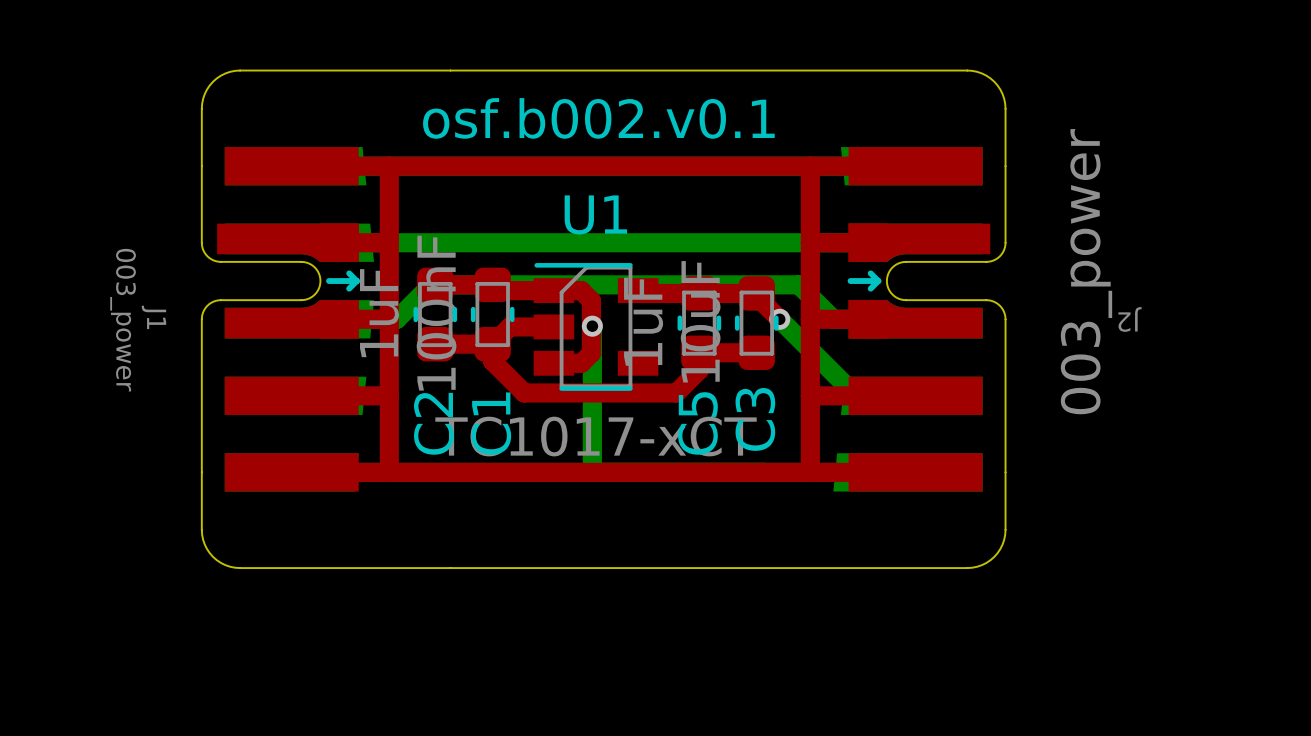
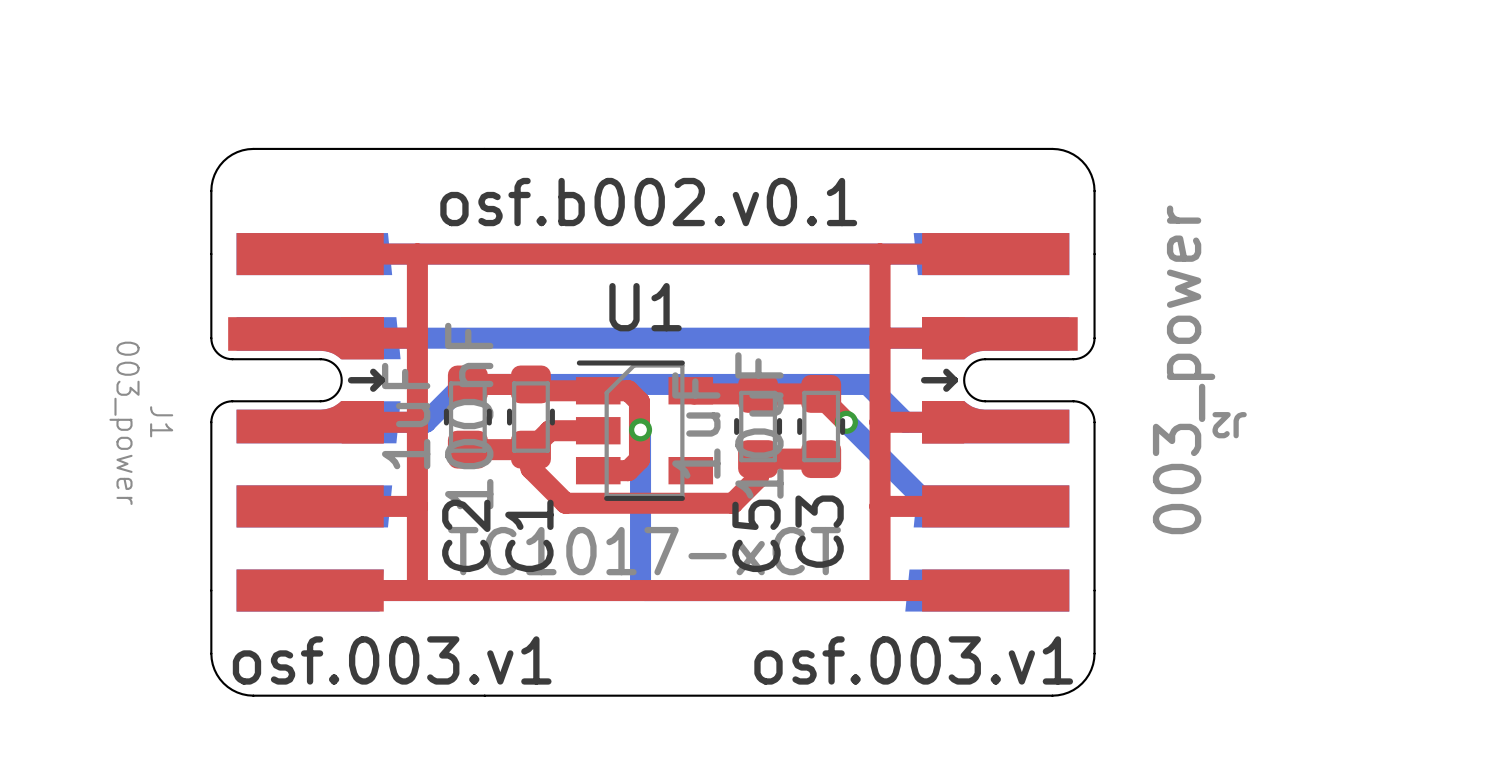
text: none -> osf.003.v1 (392, 660)
text: none -> osf.003.v1 (913, 660)

